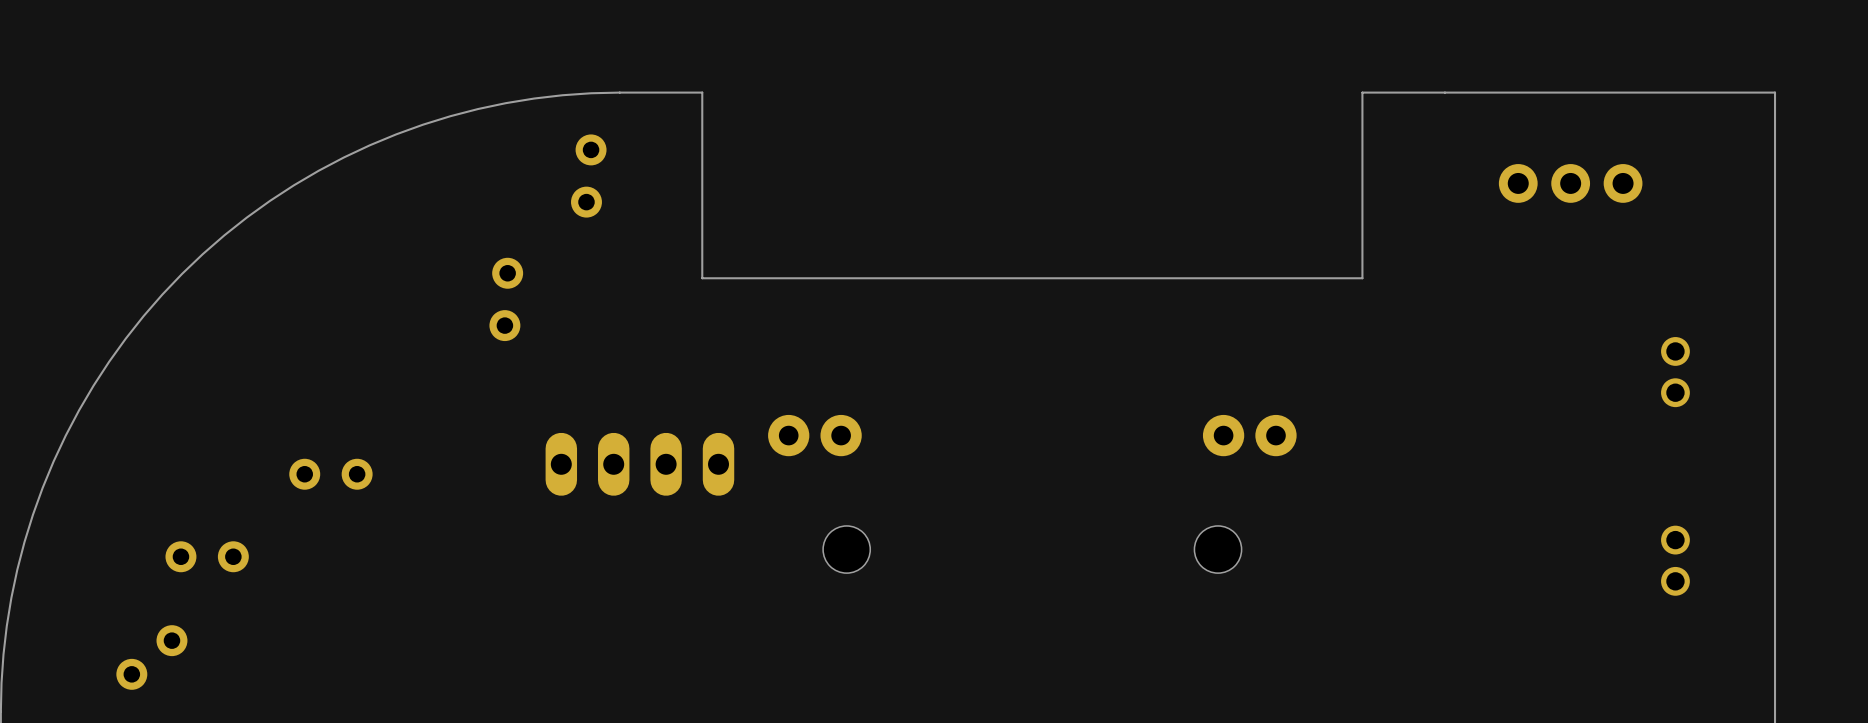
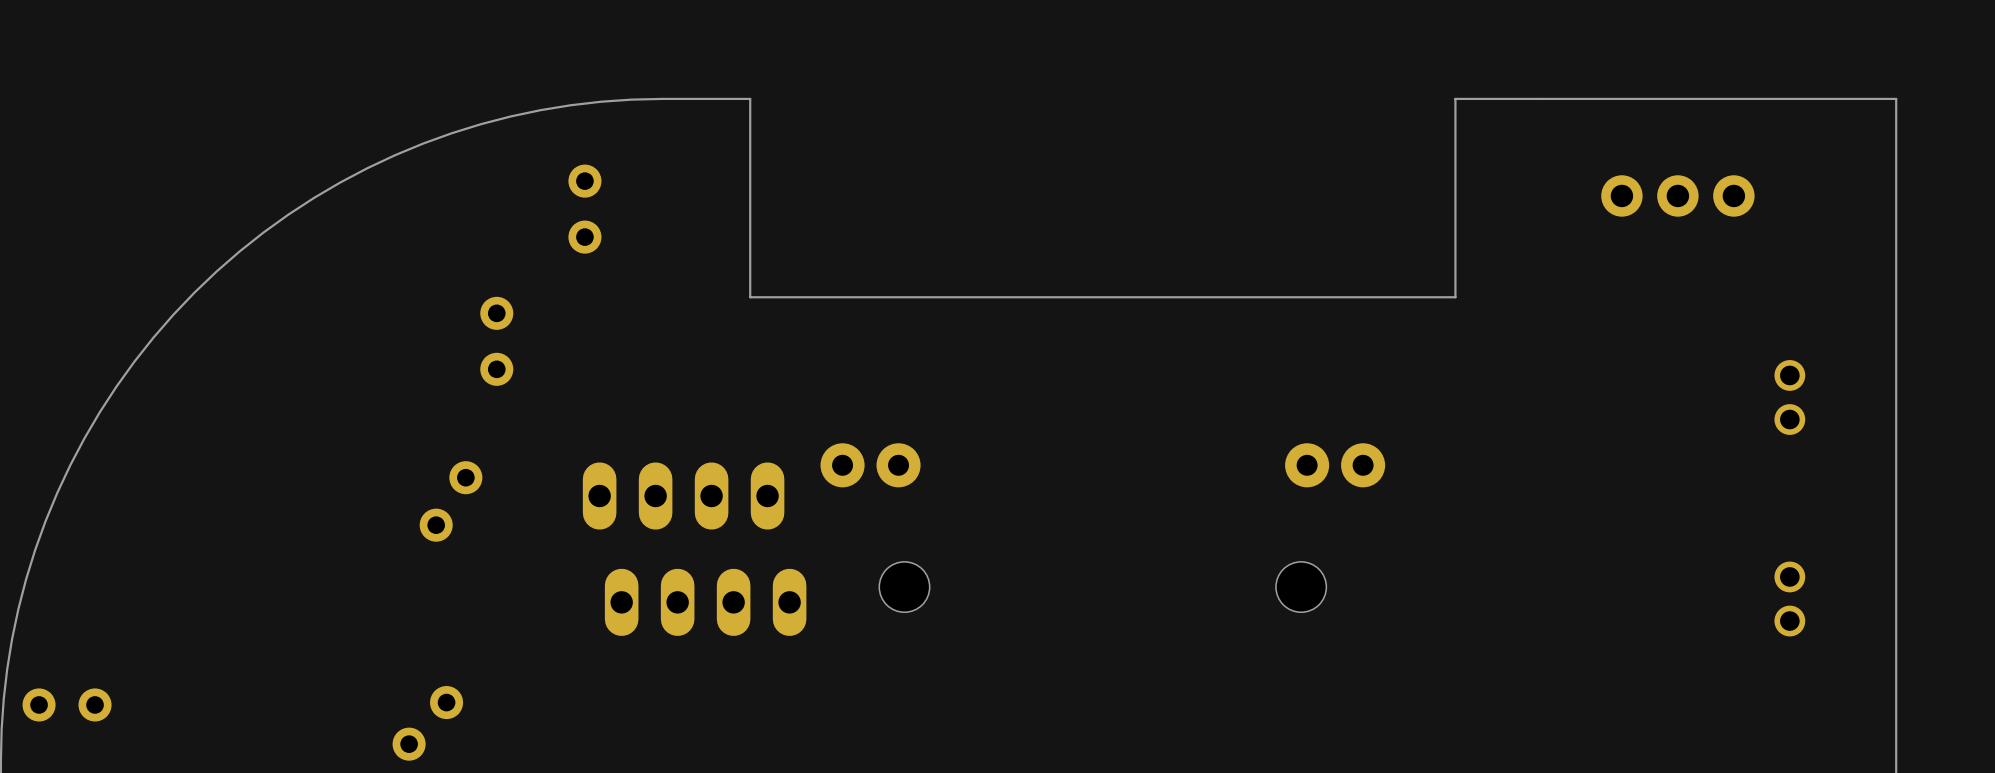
part: (588, 176) -> none
part: none -> (584, 209)
part: (506, 299) -> none
part: none -> (496, 341)
part: none -> (451, 501)
part: (330, 474) -> none
part: (207, 556) -> none
part: none -> (705, 602)
part: (151, 657) -> none
part: none -> (67, 704)
part: none -> (427, 723)

